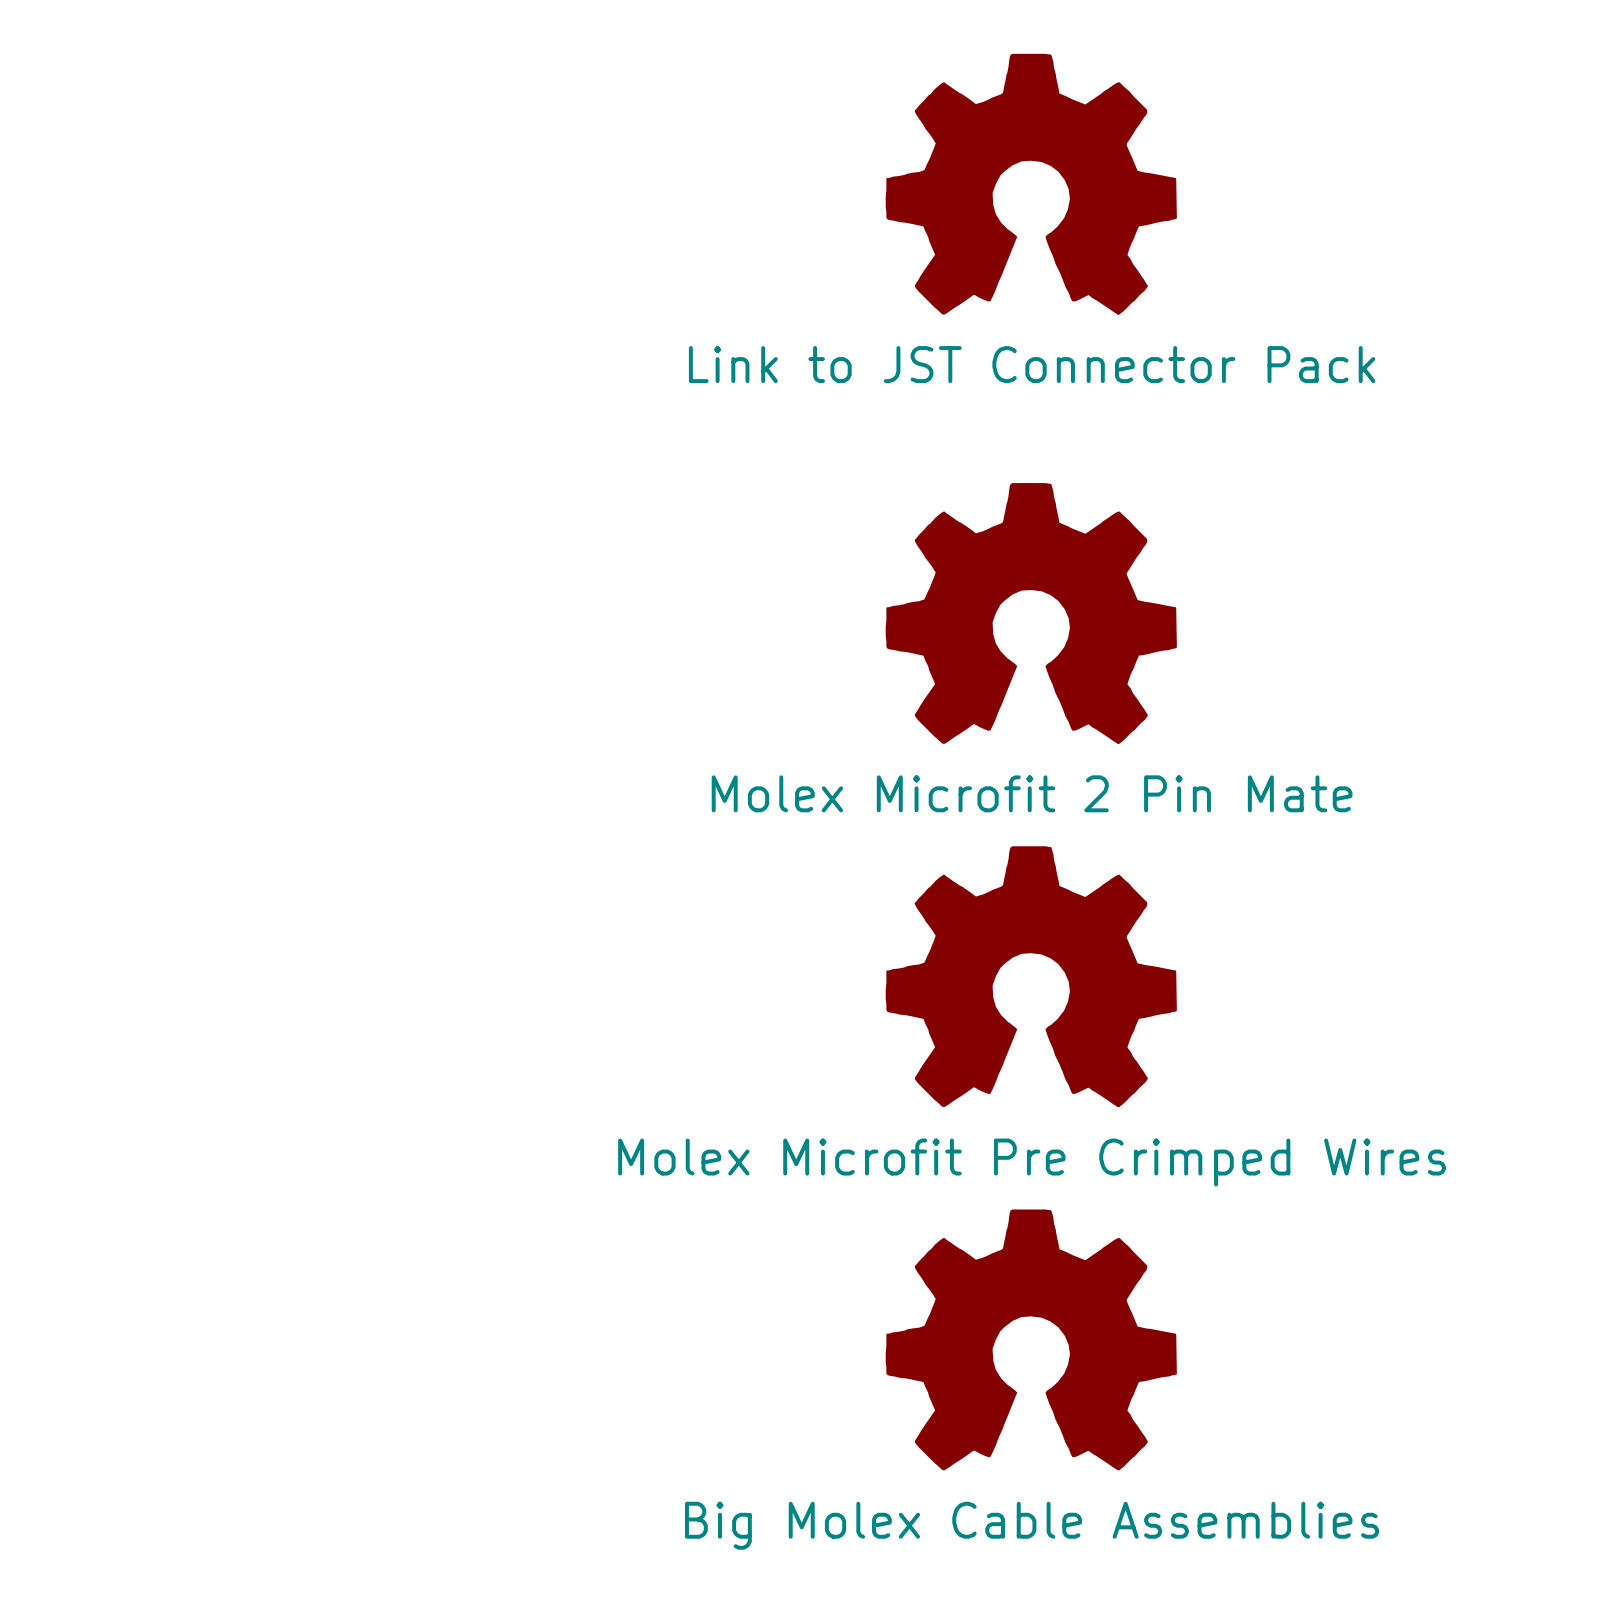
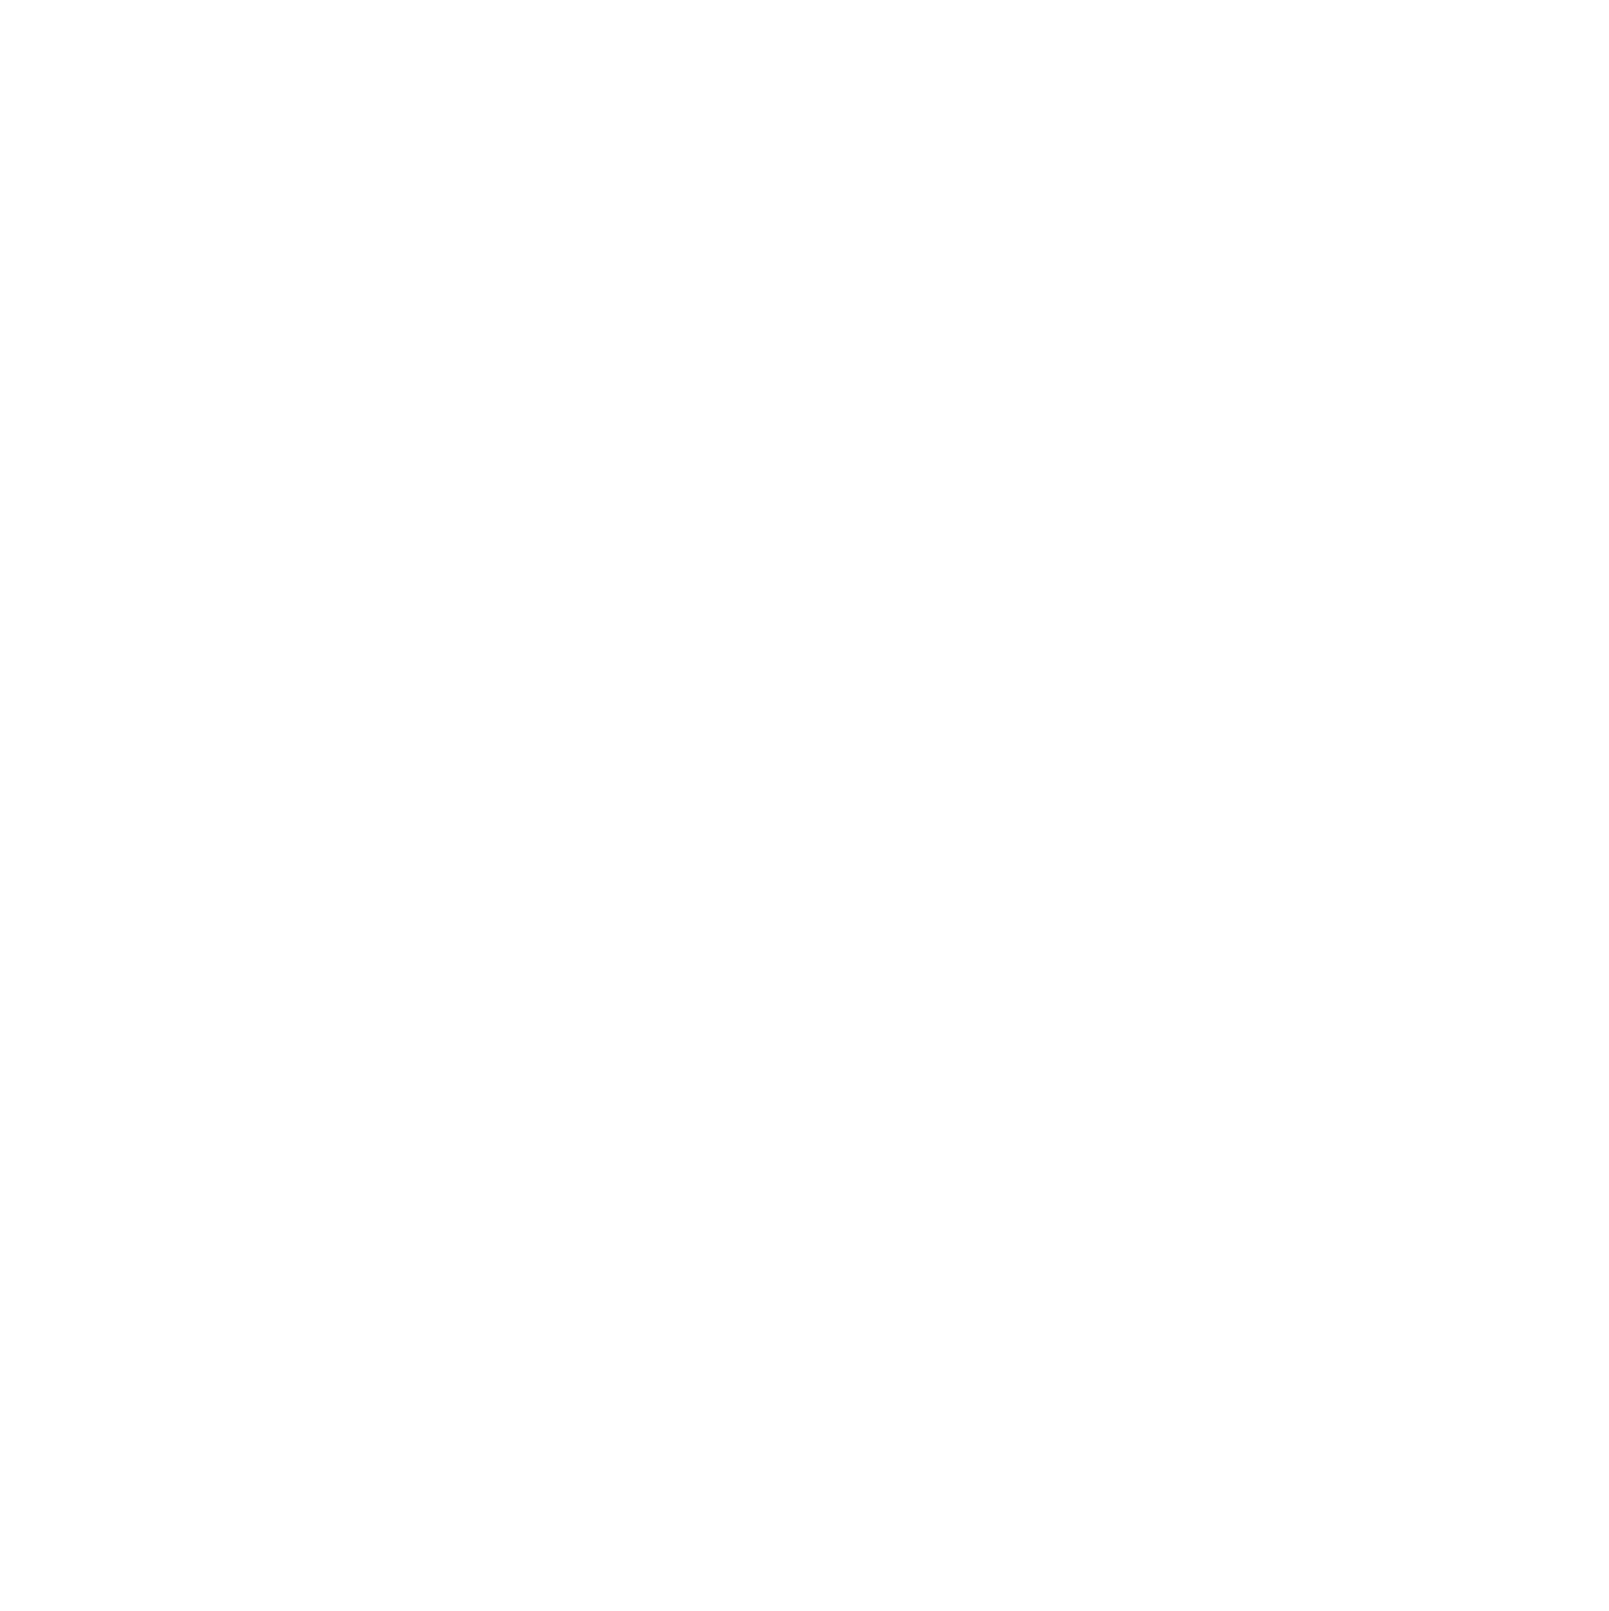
power symbol: (1031, 184) -> none
power symbol: (1031, 613) -> none
power symbol: (1031, 976) -> none
power symbol: (1031, 1339) -> none

